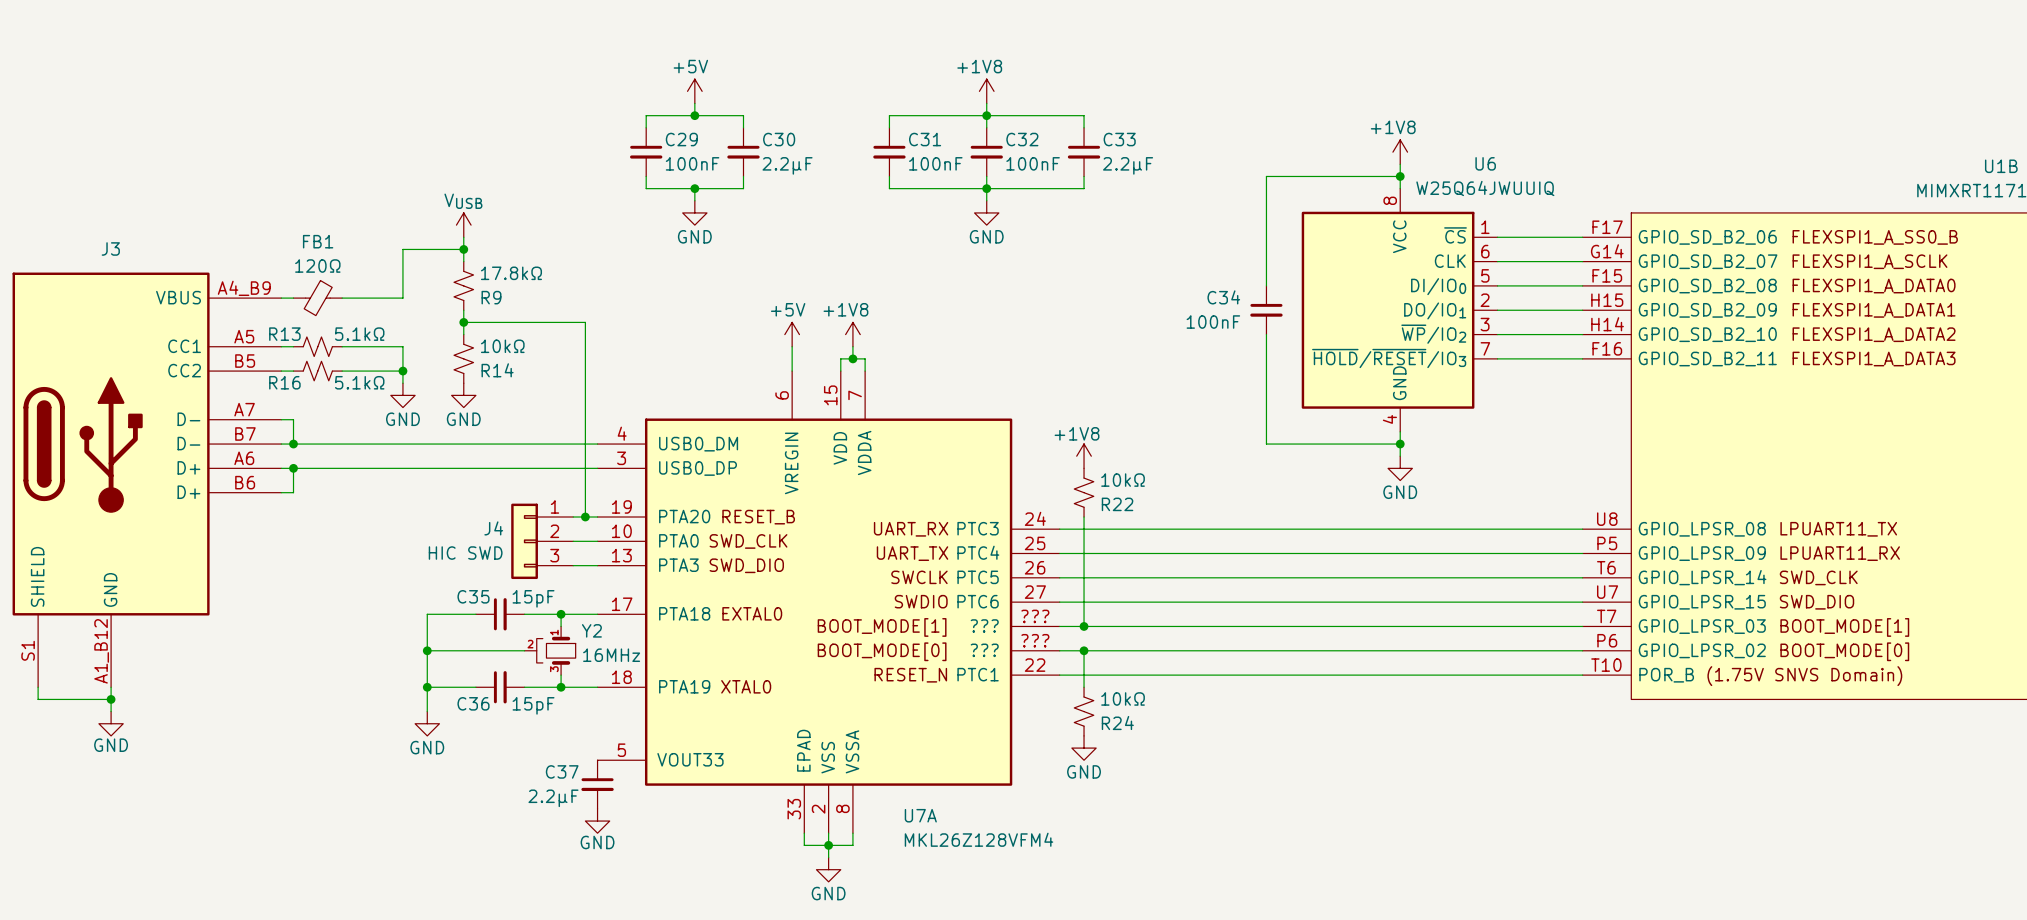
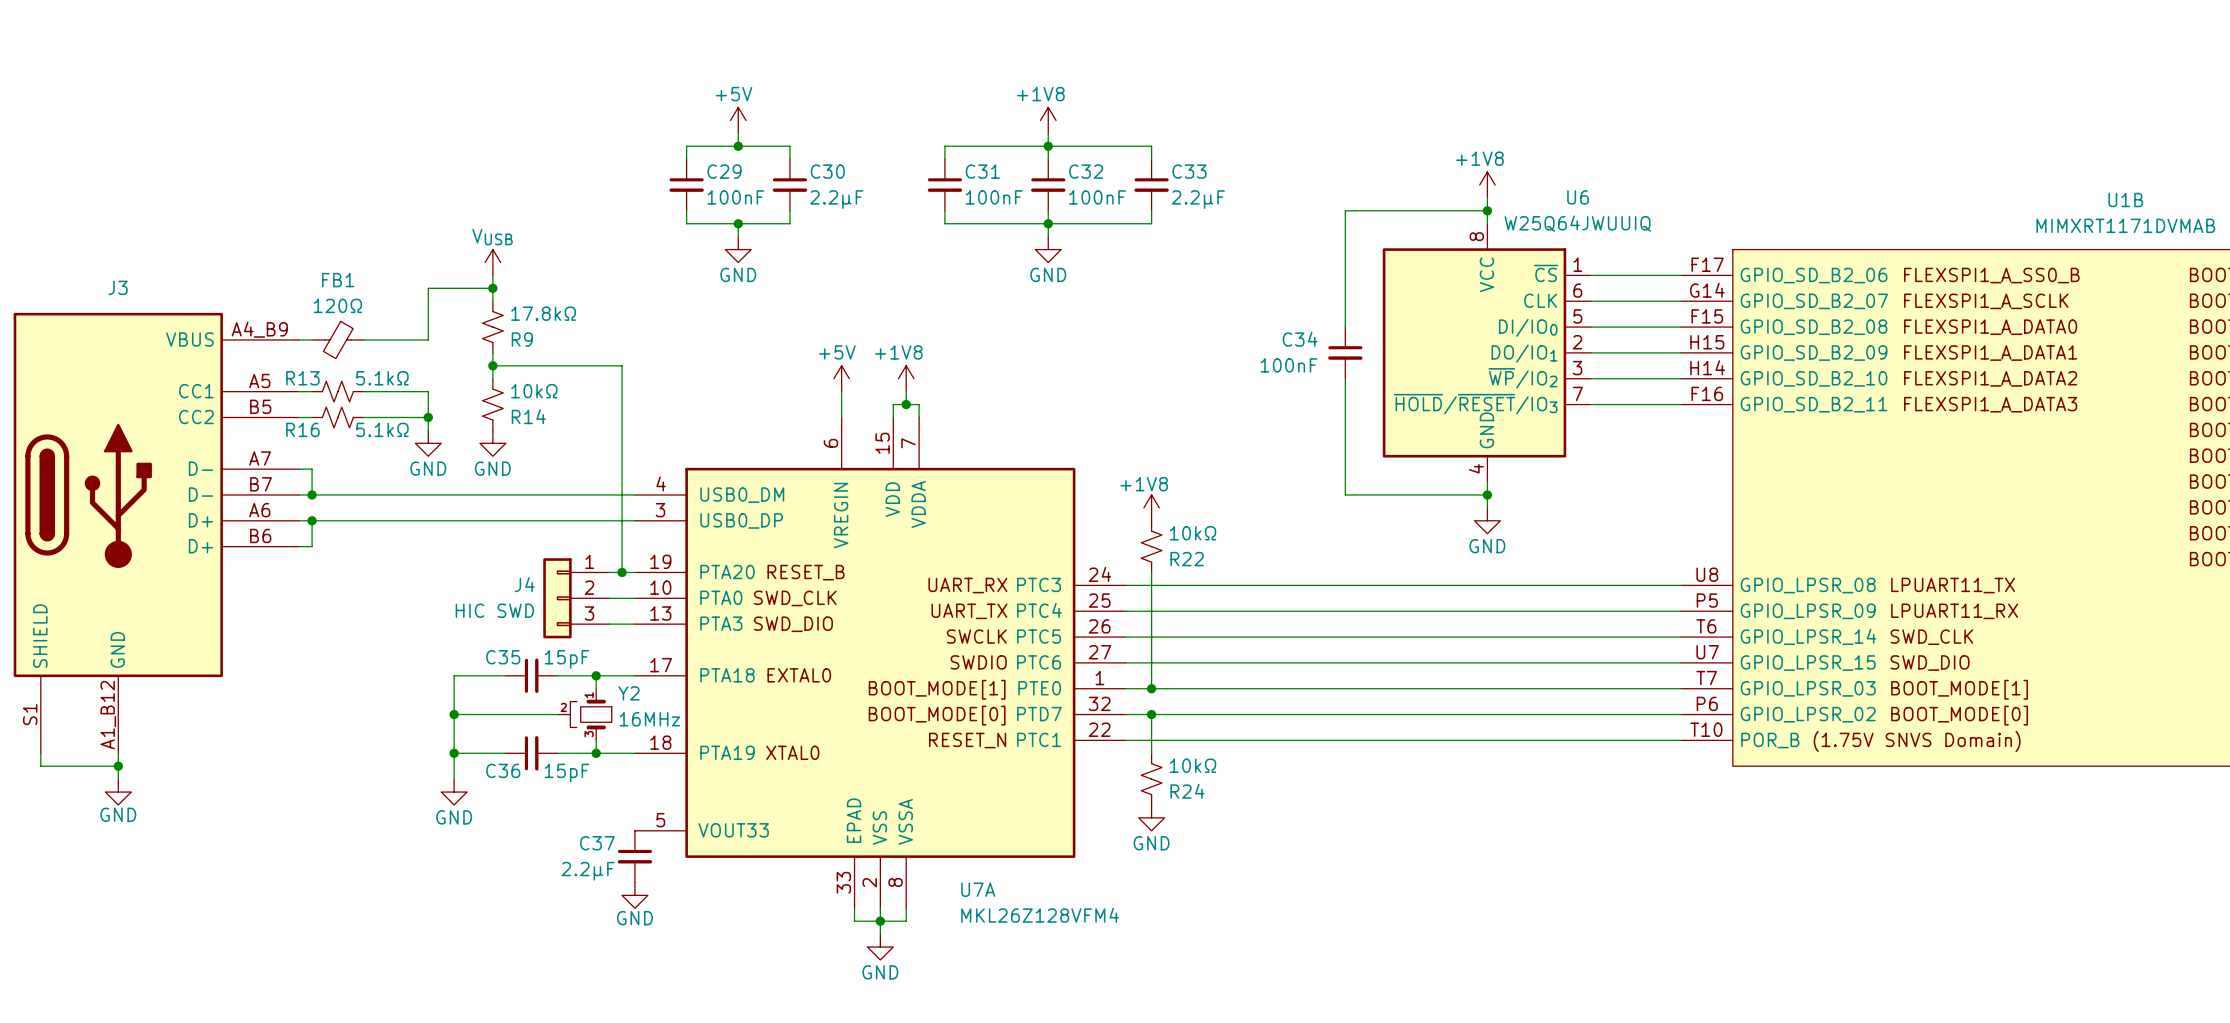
U7A pin number: ??? (1035, 616) -> 1 (1099, 678)
U7A pin name: ??? (984, 626) -> PTE0 (1039, 688)
U7A pin number: ??? (1035, 640) -> 32 (1099, 703)
U7A pin name: ??? (984, 650) -> PTD7 (1039, 714)

